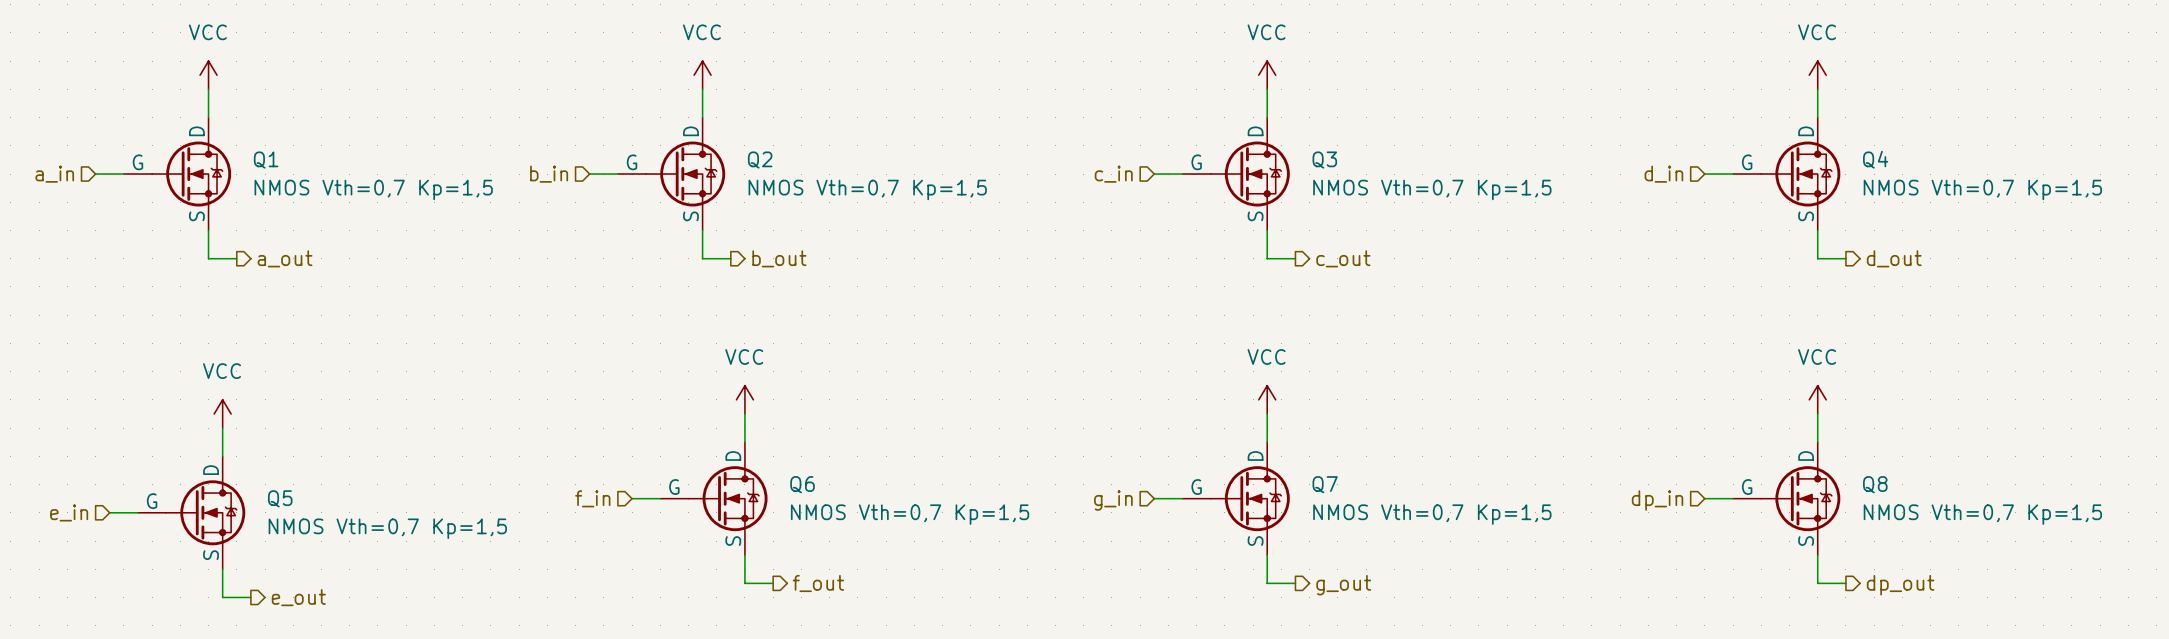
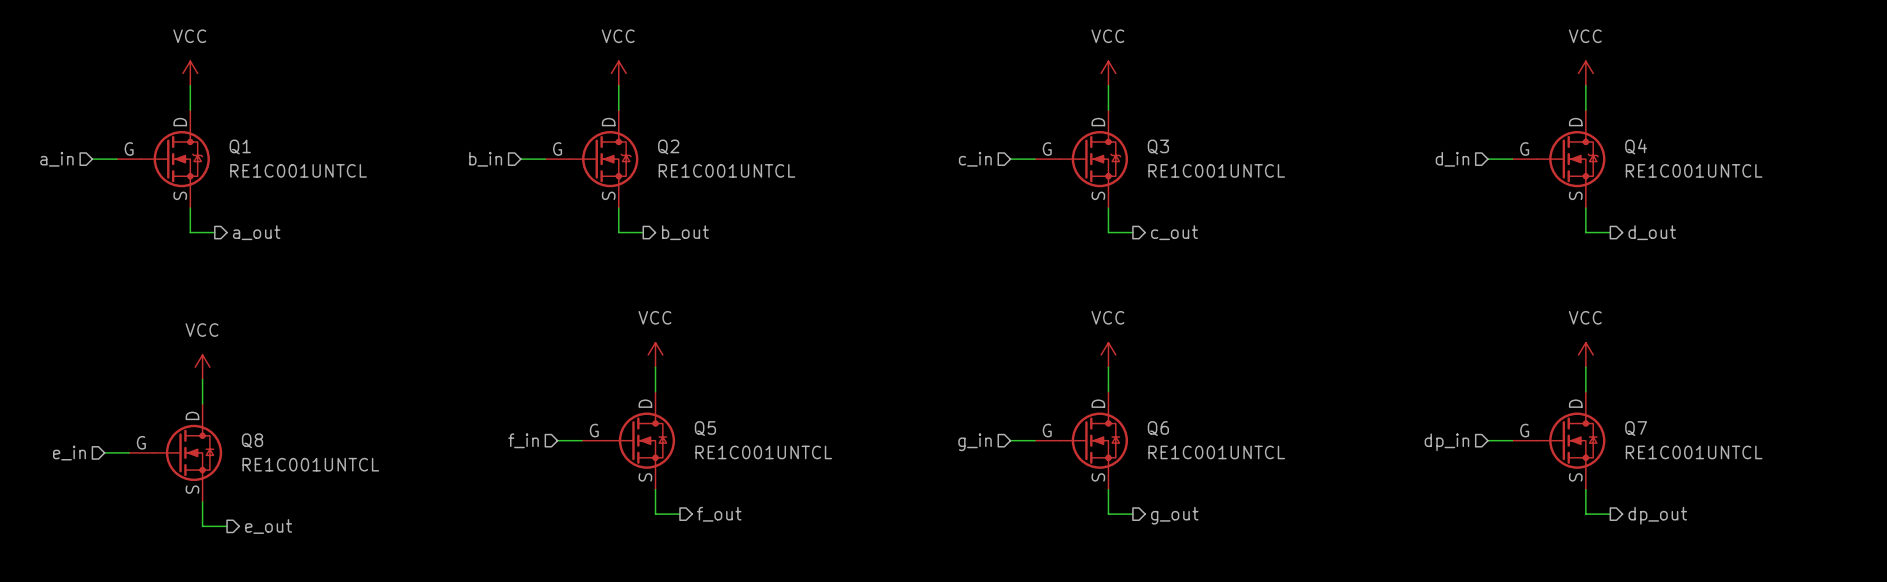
Q1 value: NMOS Vth=0,7 Kp=1,5 (373, 189) -> RE1C001UNTCL (298, 170)
Q2 value: NMOS Vth=0,7 Kp=1,5 (867, 189) -> RE1C001UNTCL (727, 170)
Q3 value: NMOS Vth=0,7 Kp=1,5 (1432, 189) -> RE1C001UNTCL (1216, 170)
Q4 value: NMOS Vth=0,7 Kp=1,5 (1982, 189) -> RE1C001UNTCL (1694, 170)
Q6 symbol: [660, 442, 768, 556] -> [1034, 391, 1129, 490]
Q7 symbol: [1182, 442, 1290, 556] -> [1512, 391, 1606, 490]
Q8 symbol: [1733, 442, 1841, 556] -> [129, 403, 223, 502]
Q5 symbol: [137, 456, 246, 570] -> [582, 391, 676, 490]
Q6 value: NMOS Vth=0,7 Kp=1,5 (910, 514) -> RE1C001UNTCL (1216, 452)
Q7 value: NMOS Vth=0,7 Kp=1,5 (1432, 514) -> RE1C001UNTCL (1694, 452)
Q8 value: NMOS Vth=0,7 Kp=1,5 (1982, 514) -> RE1C001UNTCL (310, 464)
Q5 value: NMOS Vth=0,7 Kp=1,5 (387, 528) -> RE1C001UNTCL (763, 452)

